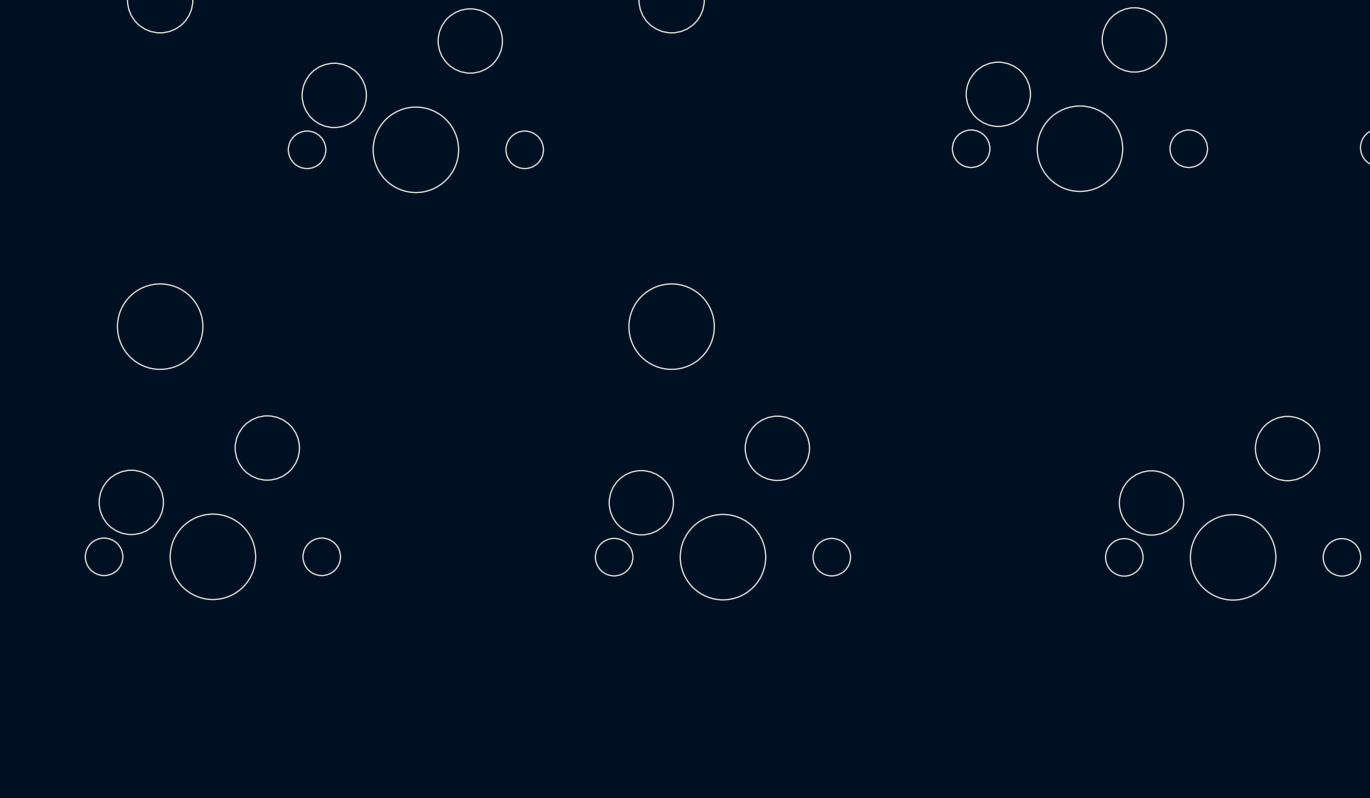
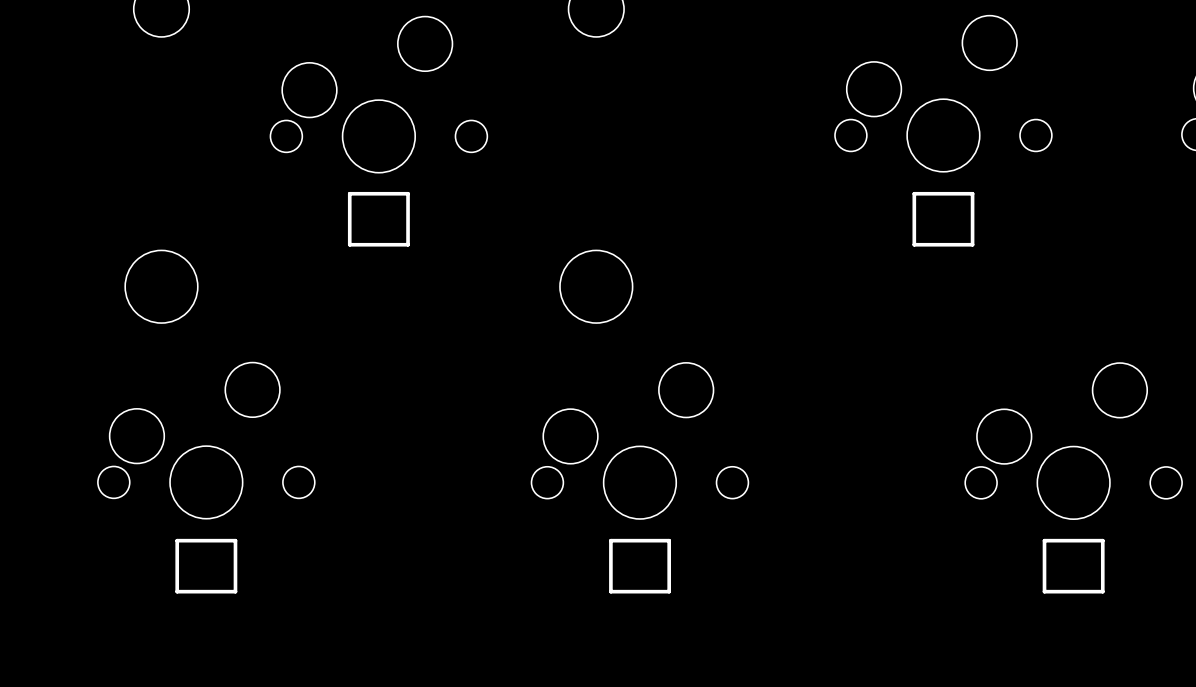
part: none -> (378, 219)
part: none -> (943, 219)
part: none -> (206, 566)
part: none -> (640, 566)
part: none -> (1073, 566)

